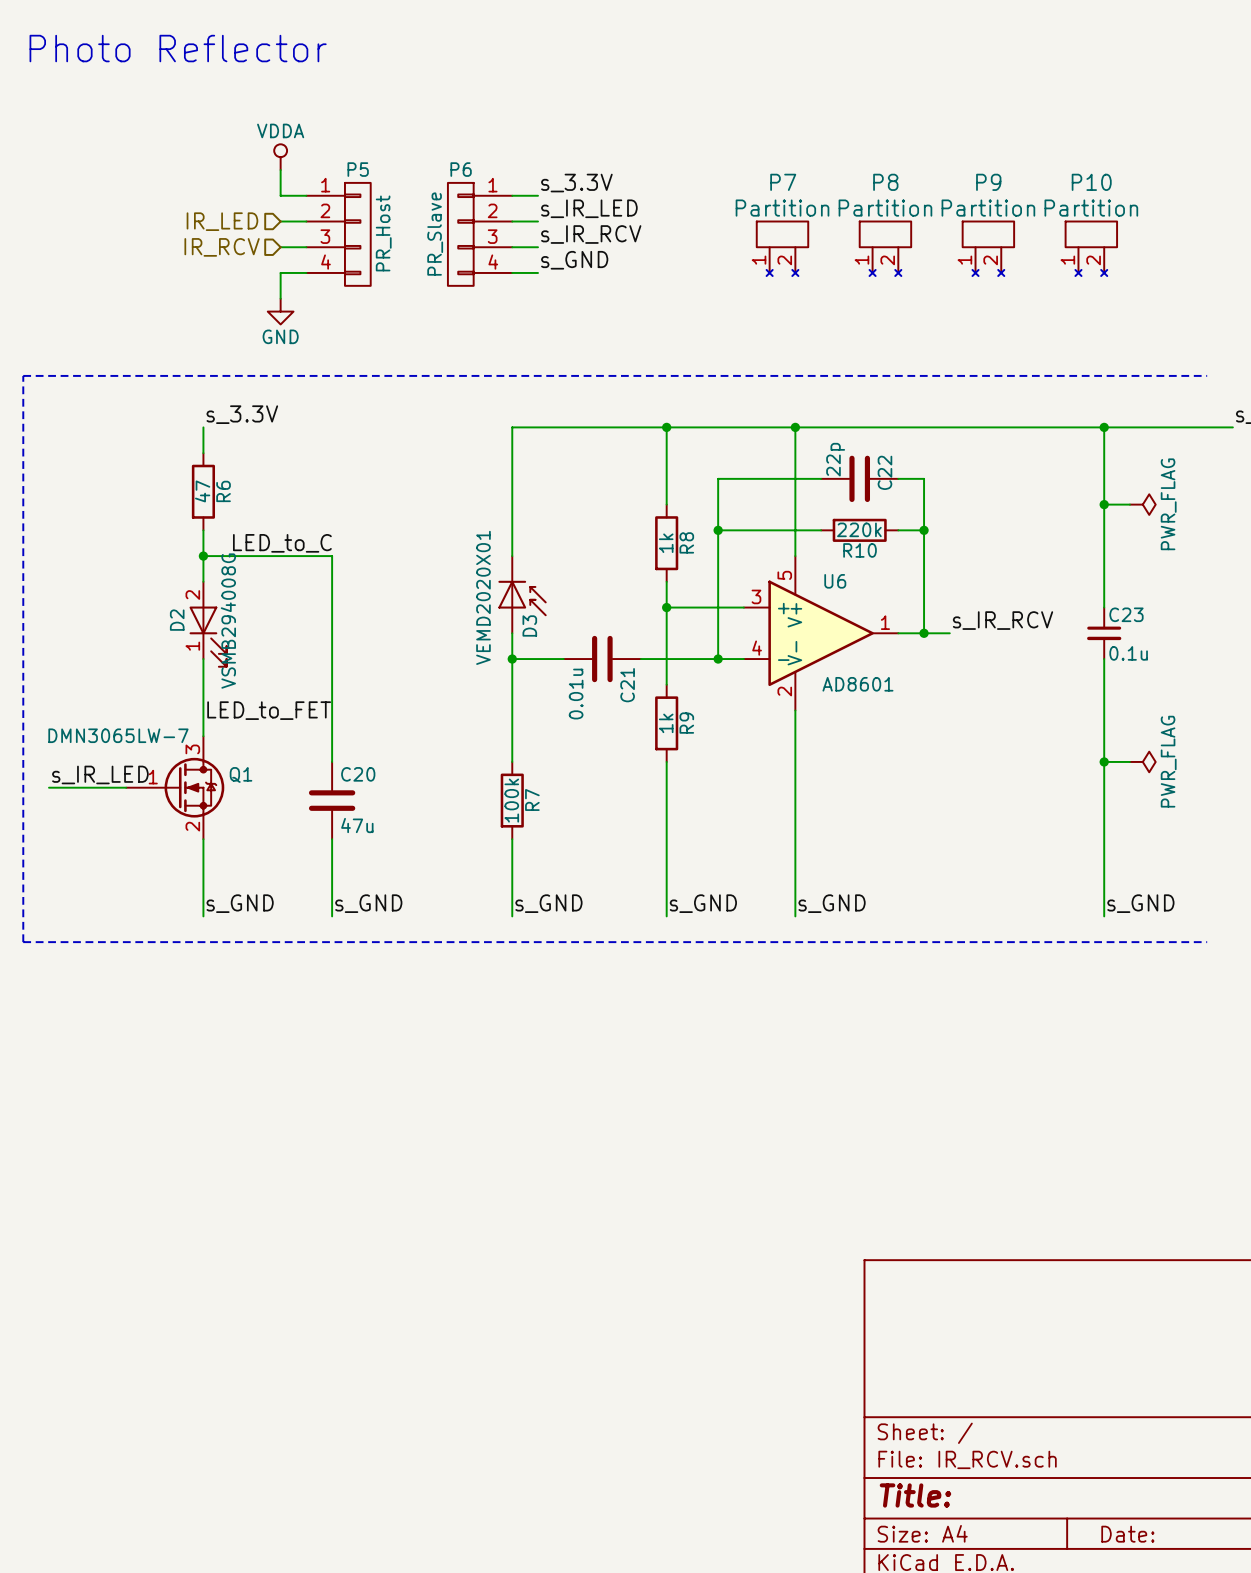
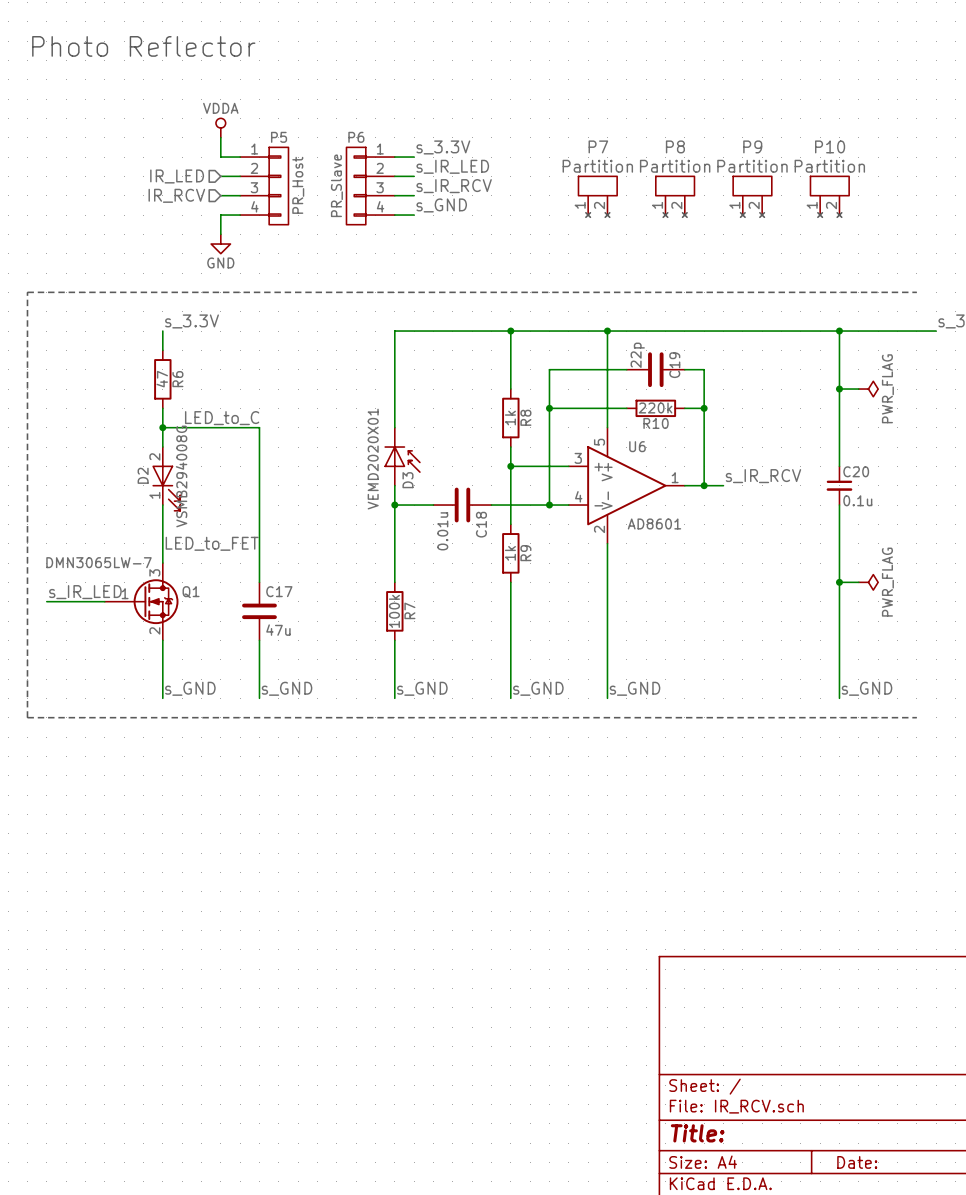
C22 name: C22 (884, 472) -> C19 (674, 365)
C23 name: C23 (1126, 614) -> C20 (856, 471)
C21 name: C21 (627, 685) -> C18 (481, 524)
C20 name: C20 (358, 774) -> C17 (279, 591)

